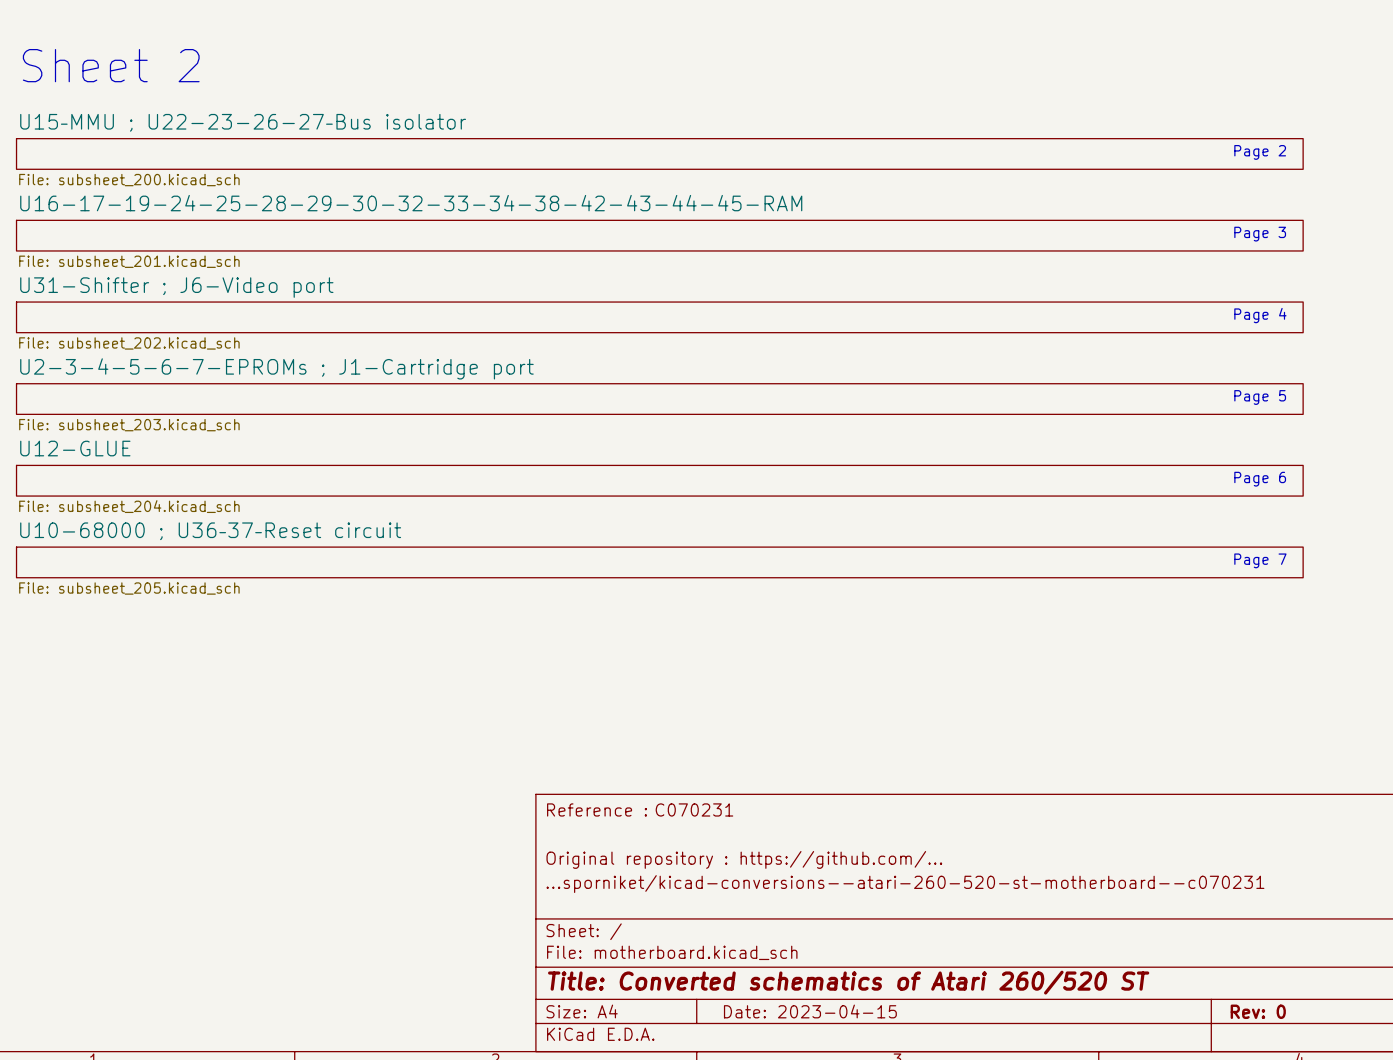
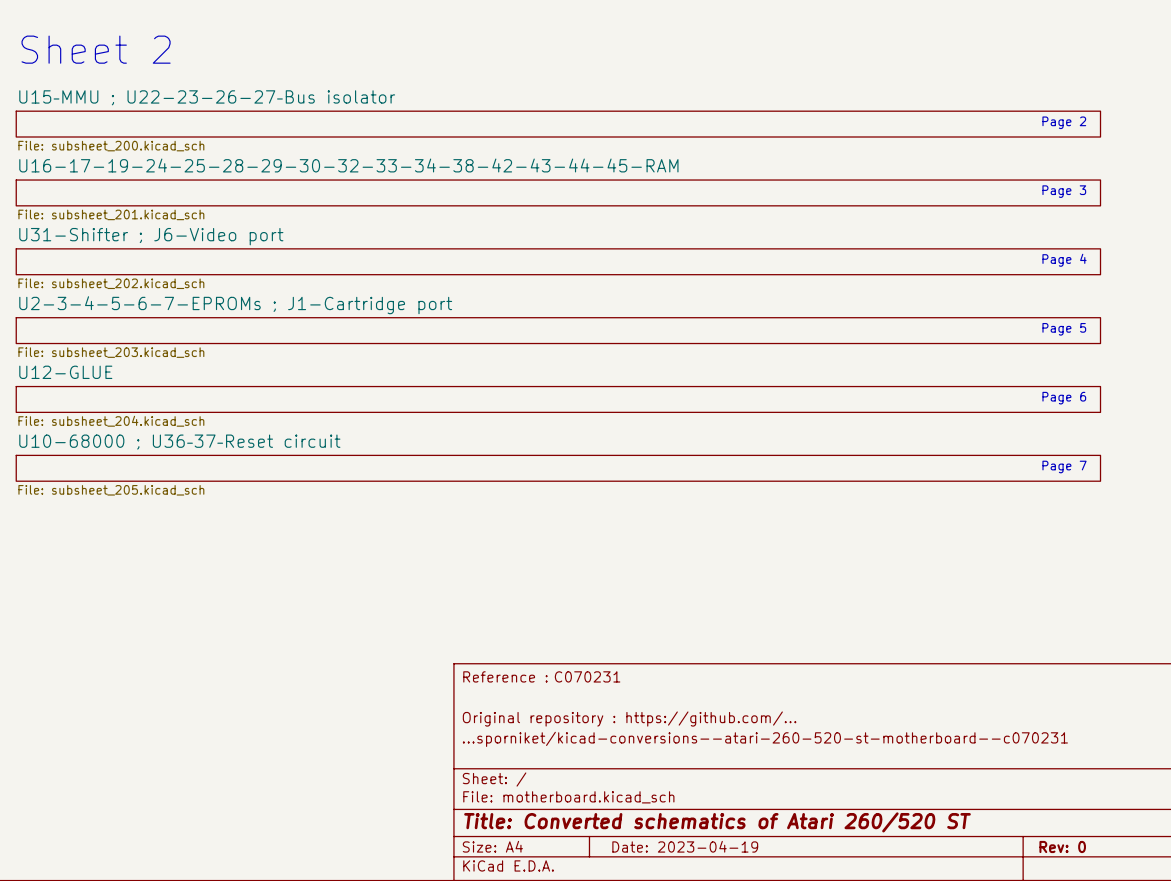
title block: Date: 2023-04-15 (810, 1011) -> Date: 2023-04-19 (685, 846)

